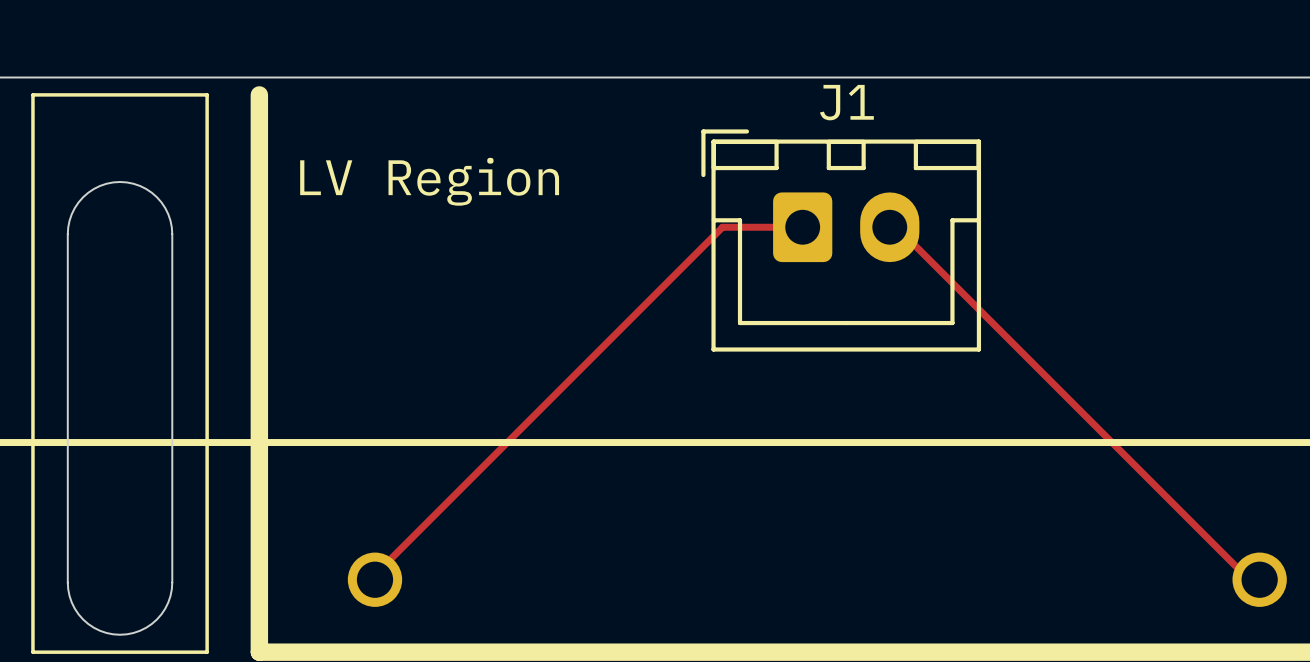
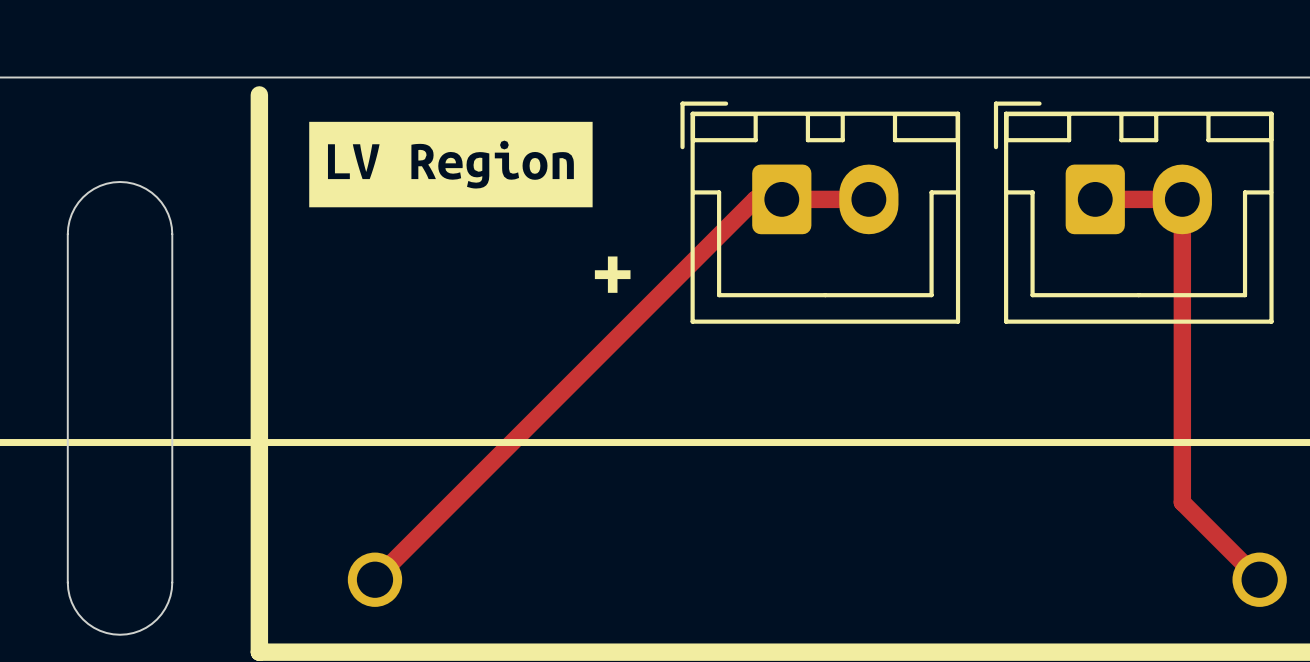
line: (32, 94) (207, 94) (207, 652) (32, 652) (32, 94) -> none
J1 name: J1 (846, 102) -> none
drawing: none -> [309, 121, 593, 208]
text: LV Region (429, 181) -> none
track: none -> (868, 199) (755, 199) (374, 579)
track: none -> (1095, 199) (1182, 199) (1182, 502) (1259, 579)
part: none -> (1133, 212)
track: (802, 227) (722, 227) (367, 582) -> none
track: (889, 227) (896, 227) (1252, 582) -> none
J1 position: (841, 240) -> (820, 212)
text: none -> + (612, 274)

